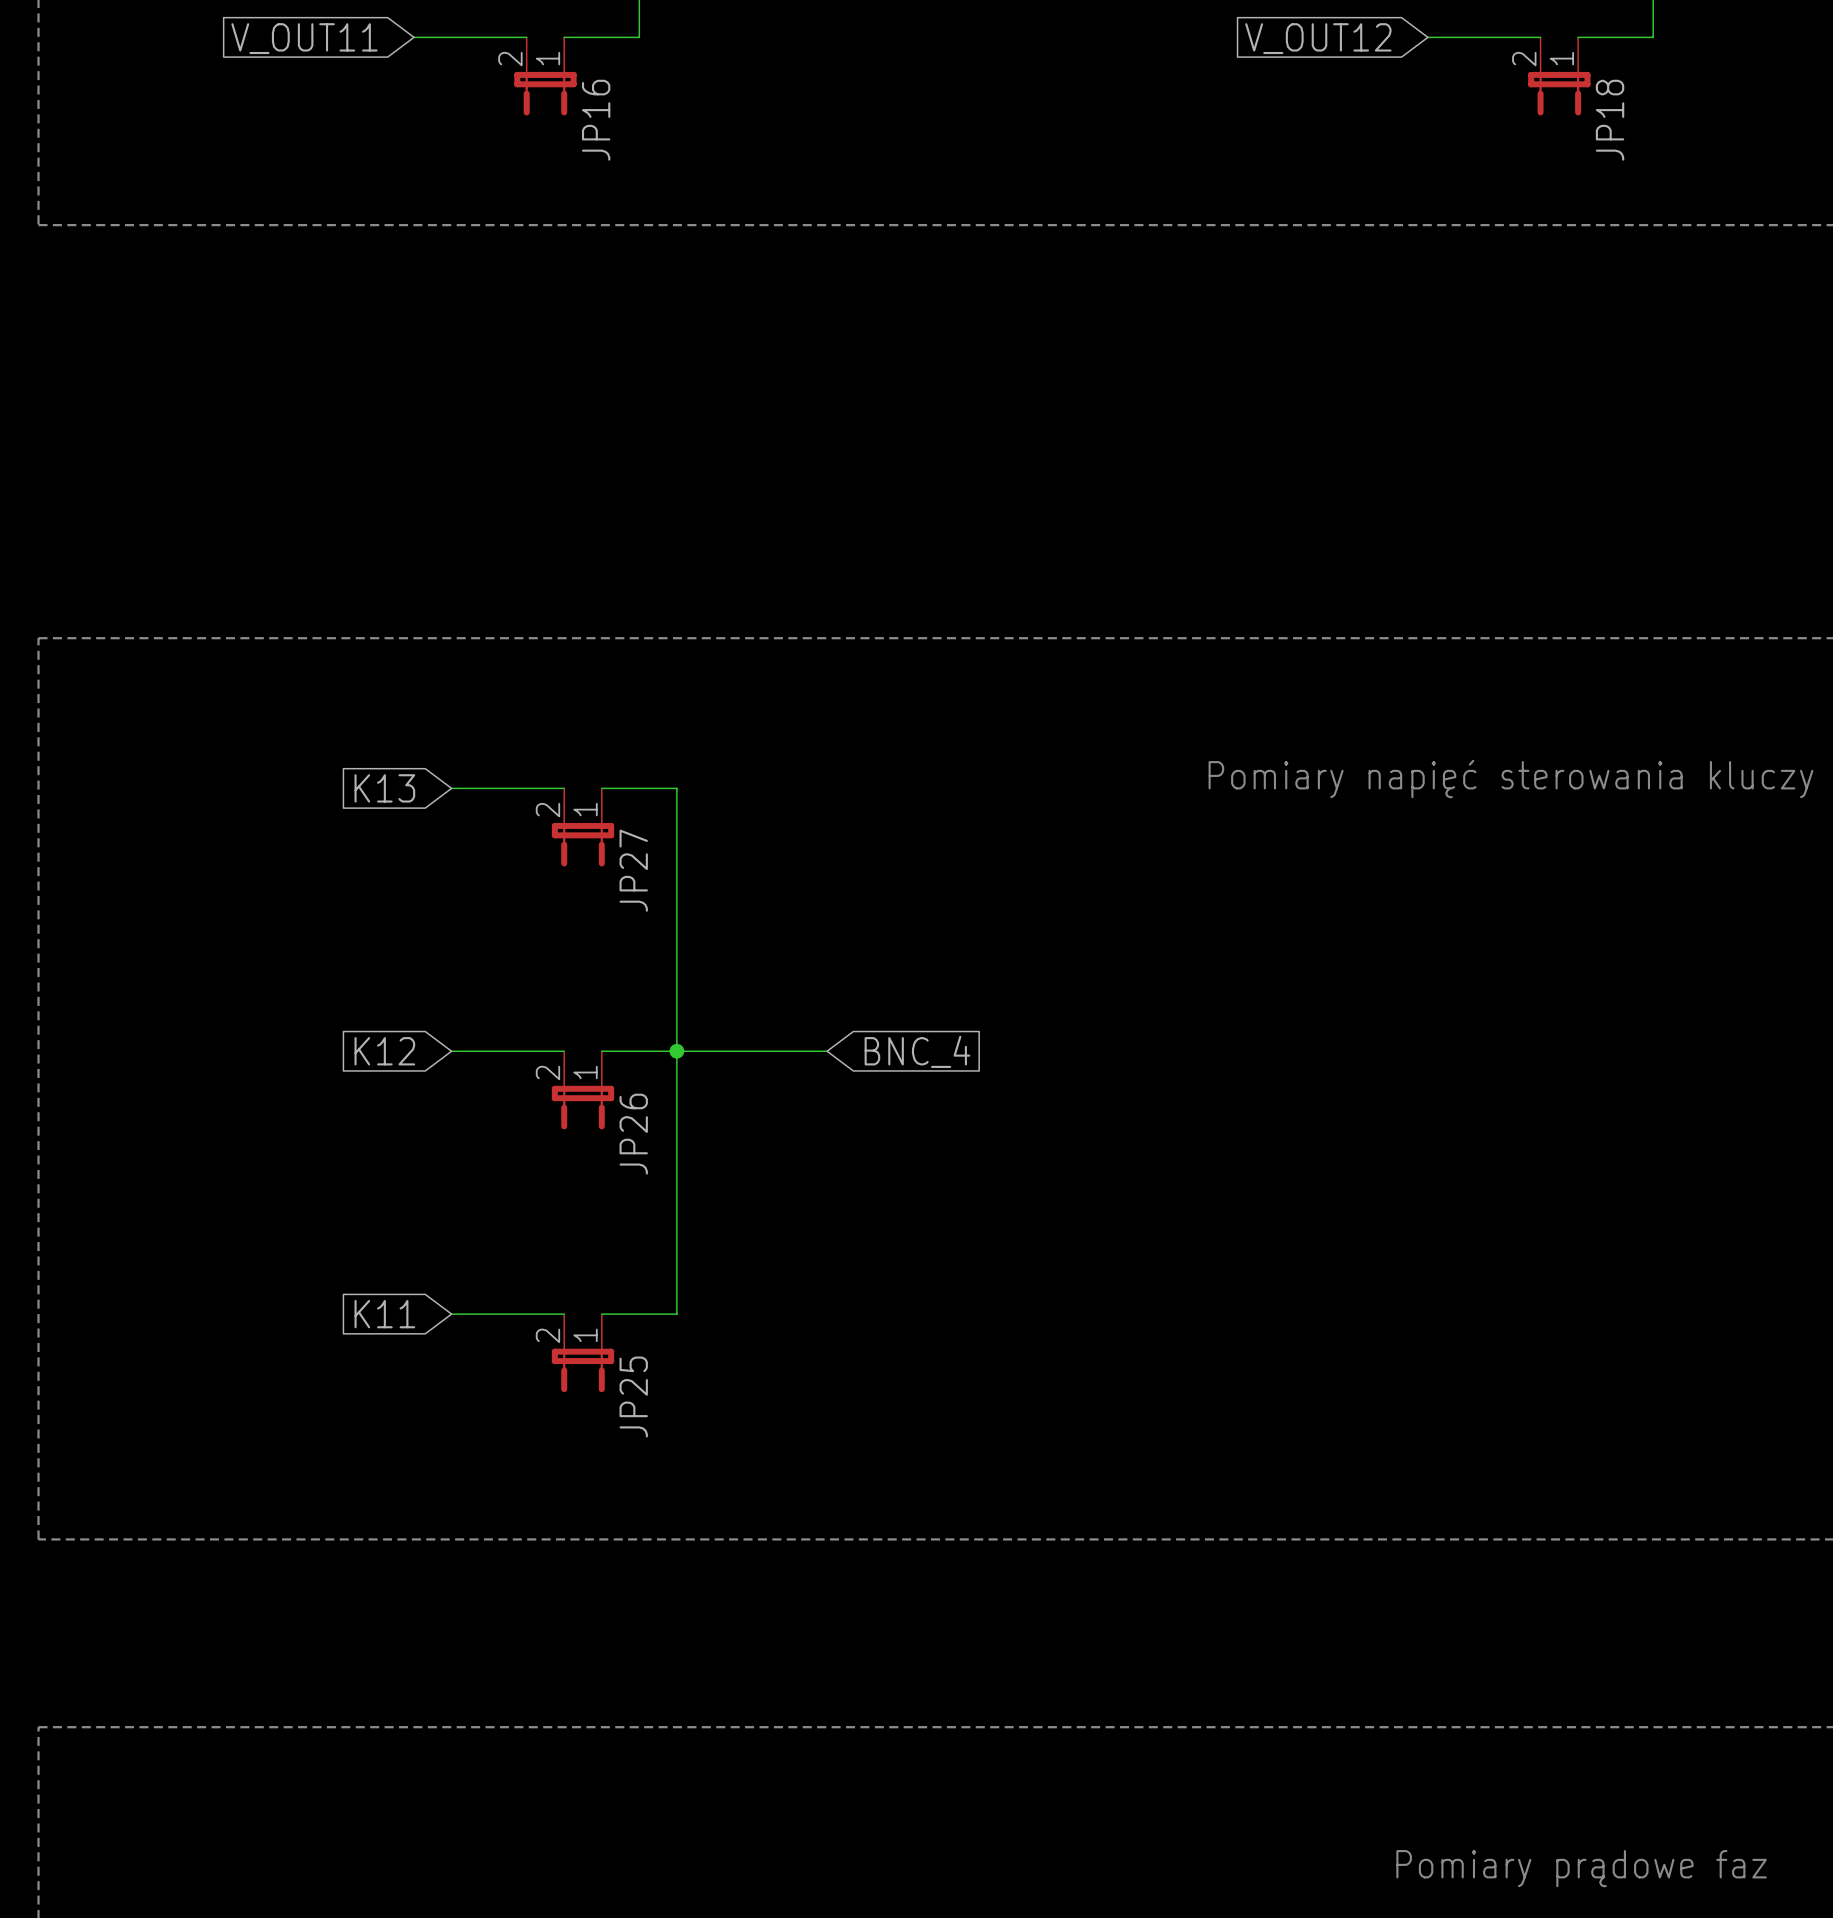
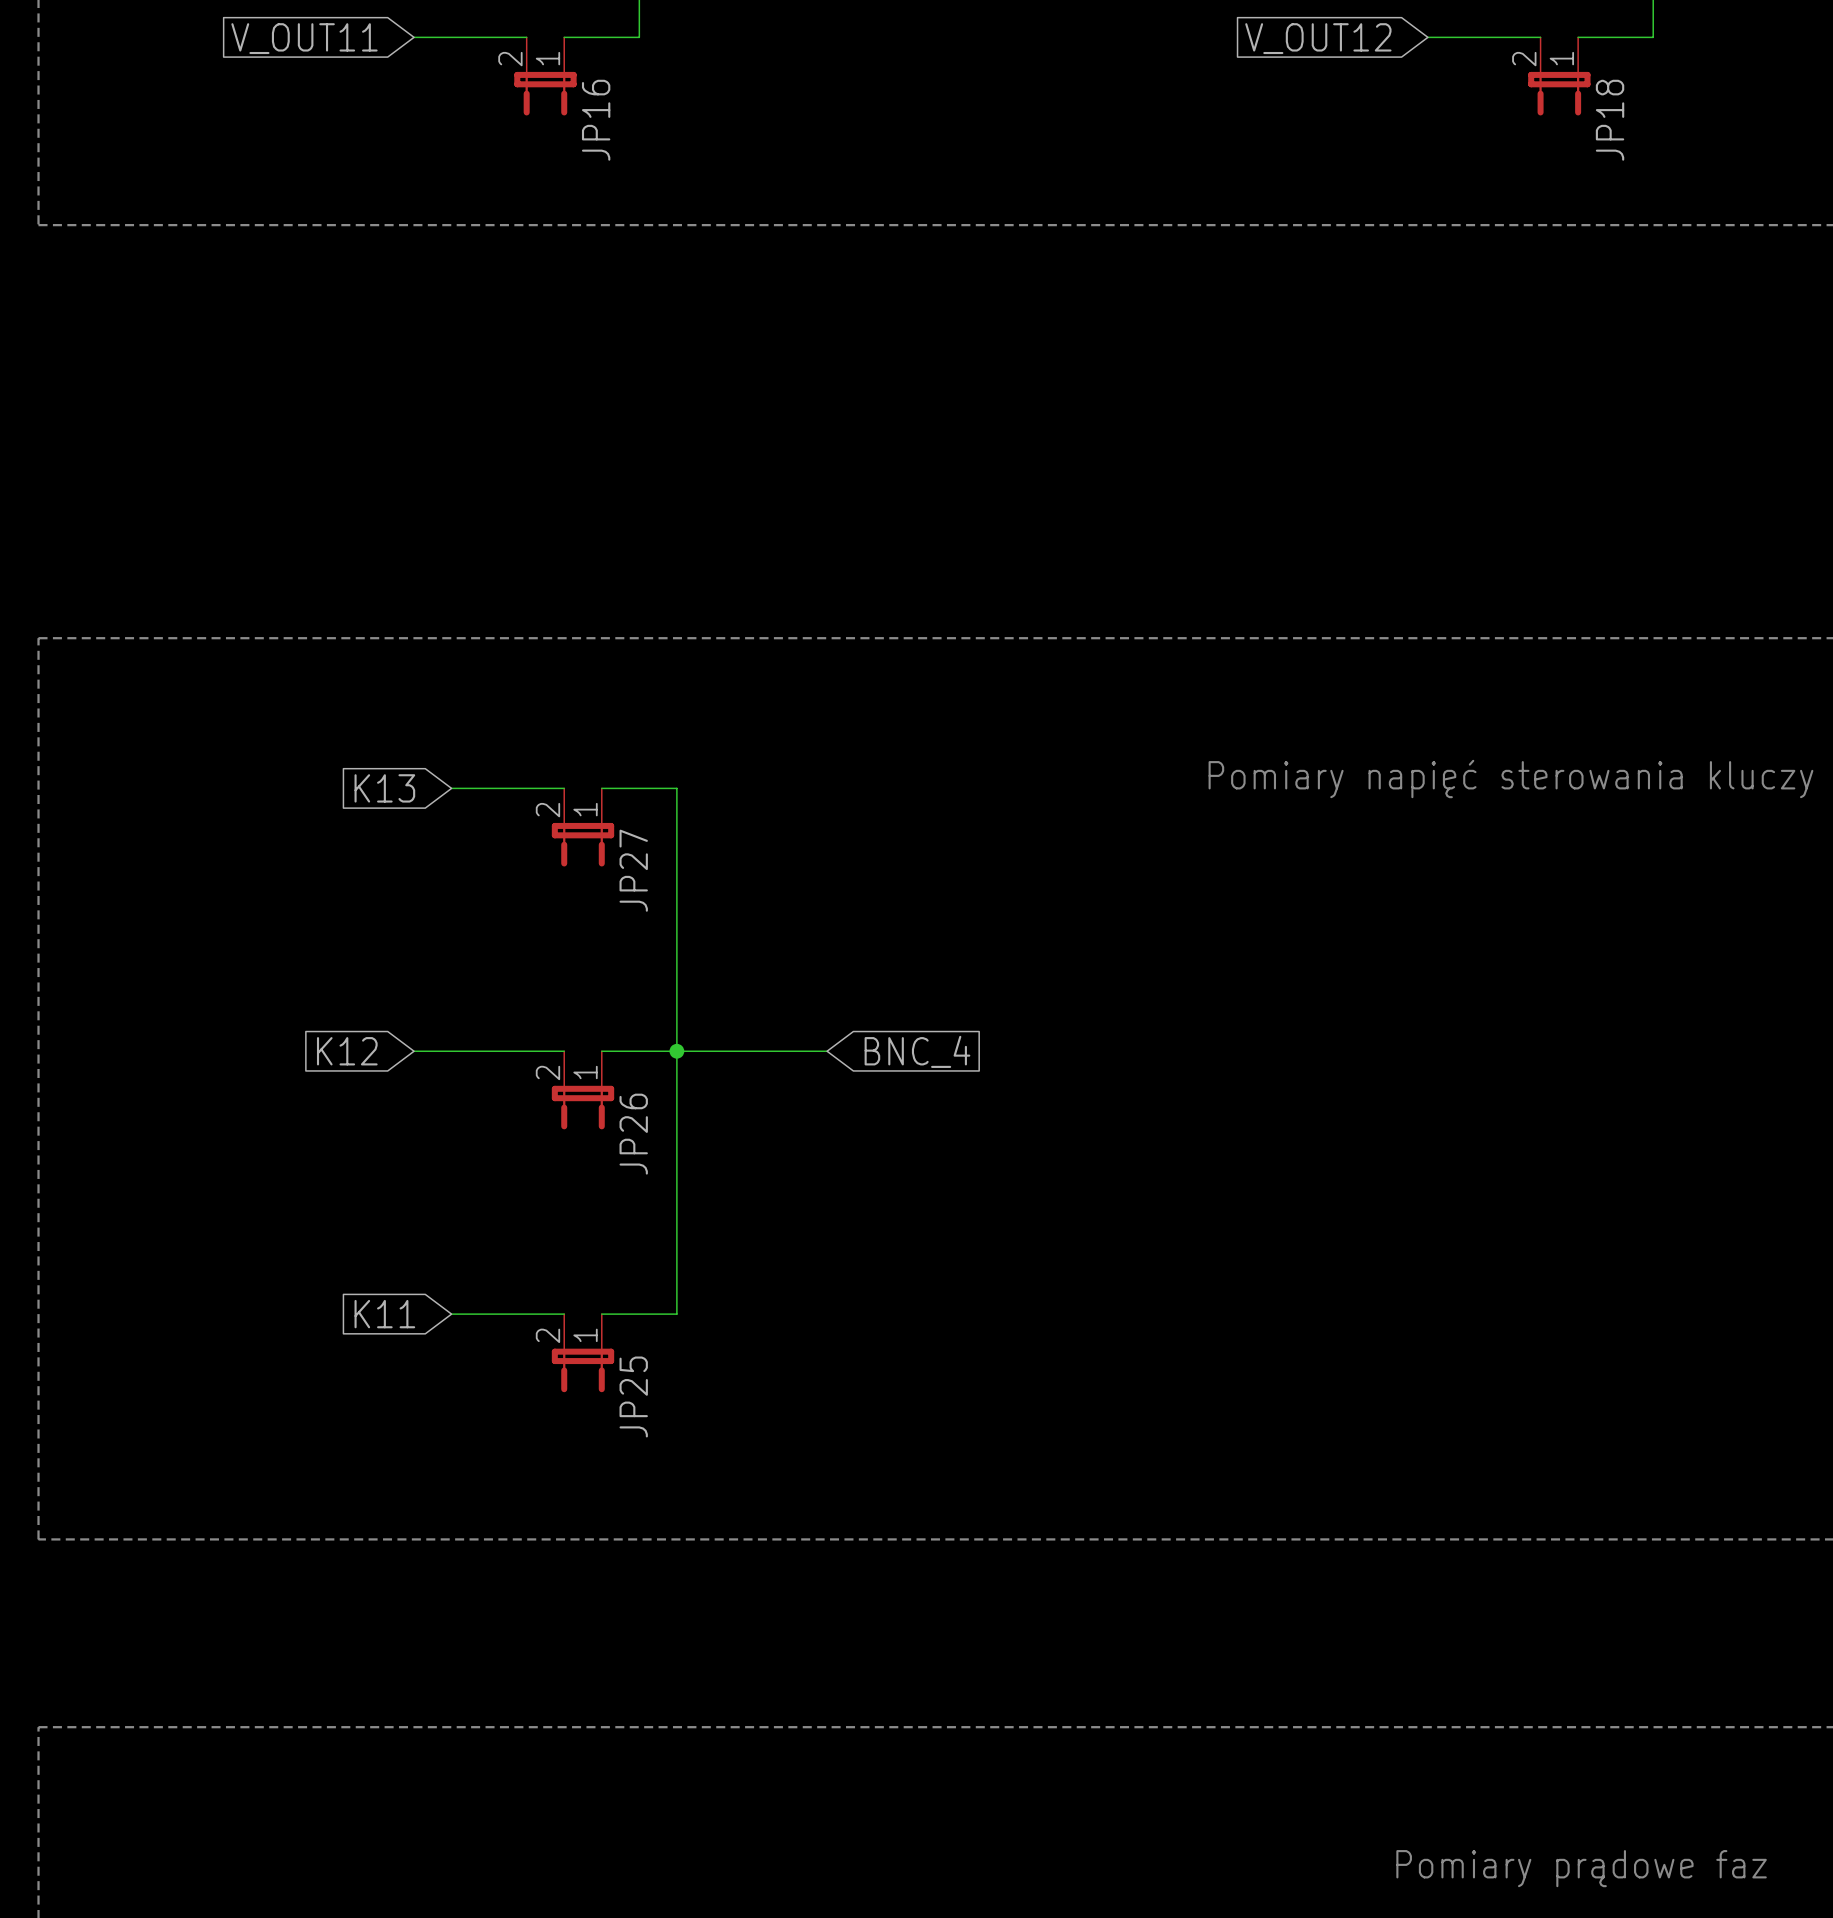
global label position: K12 (384, 1051) -> K12 (347, 1051)
wire: none -> (414, 1051) (451, 1051)

